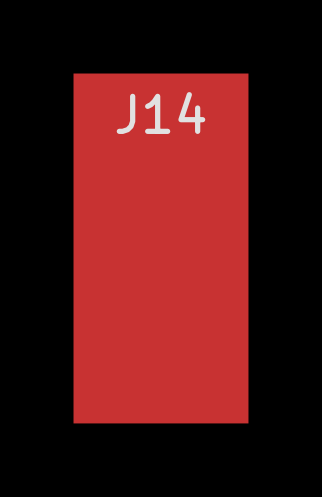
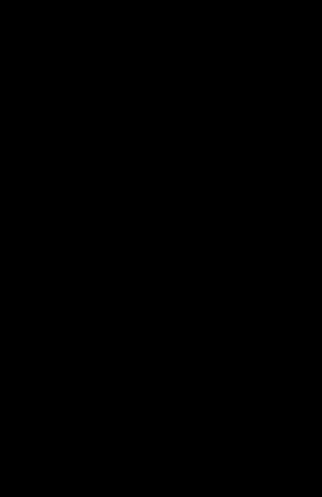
J14: (160, 248) -> none

